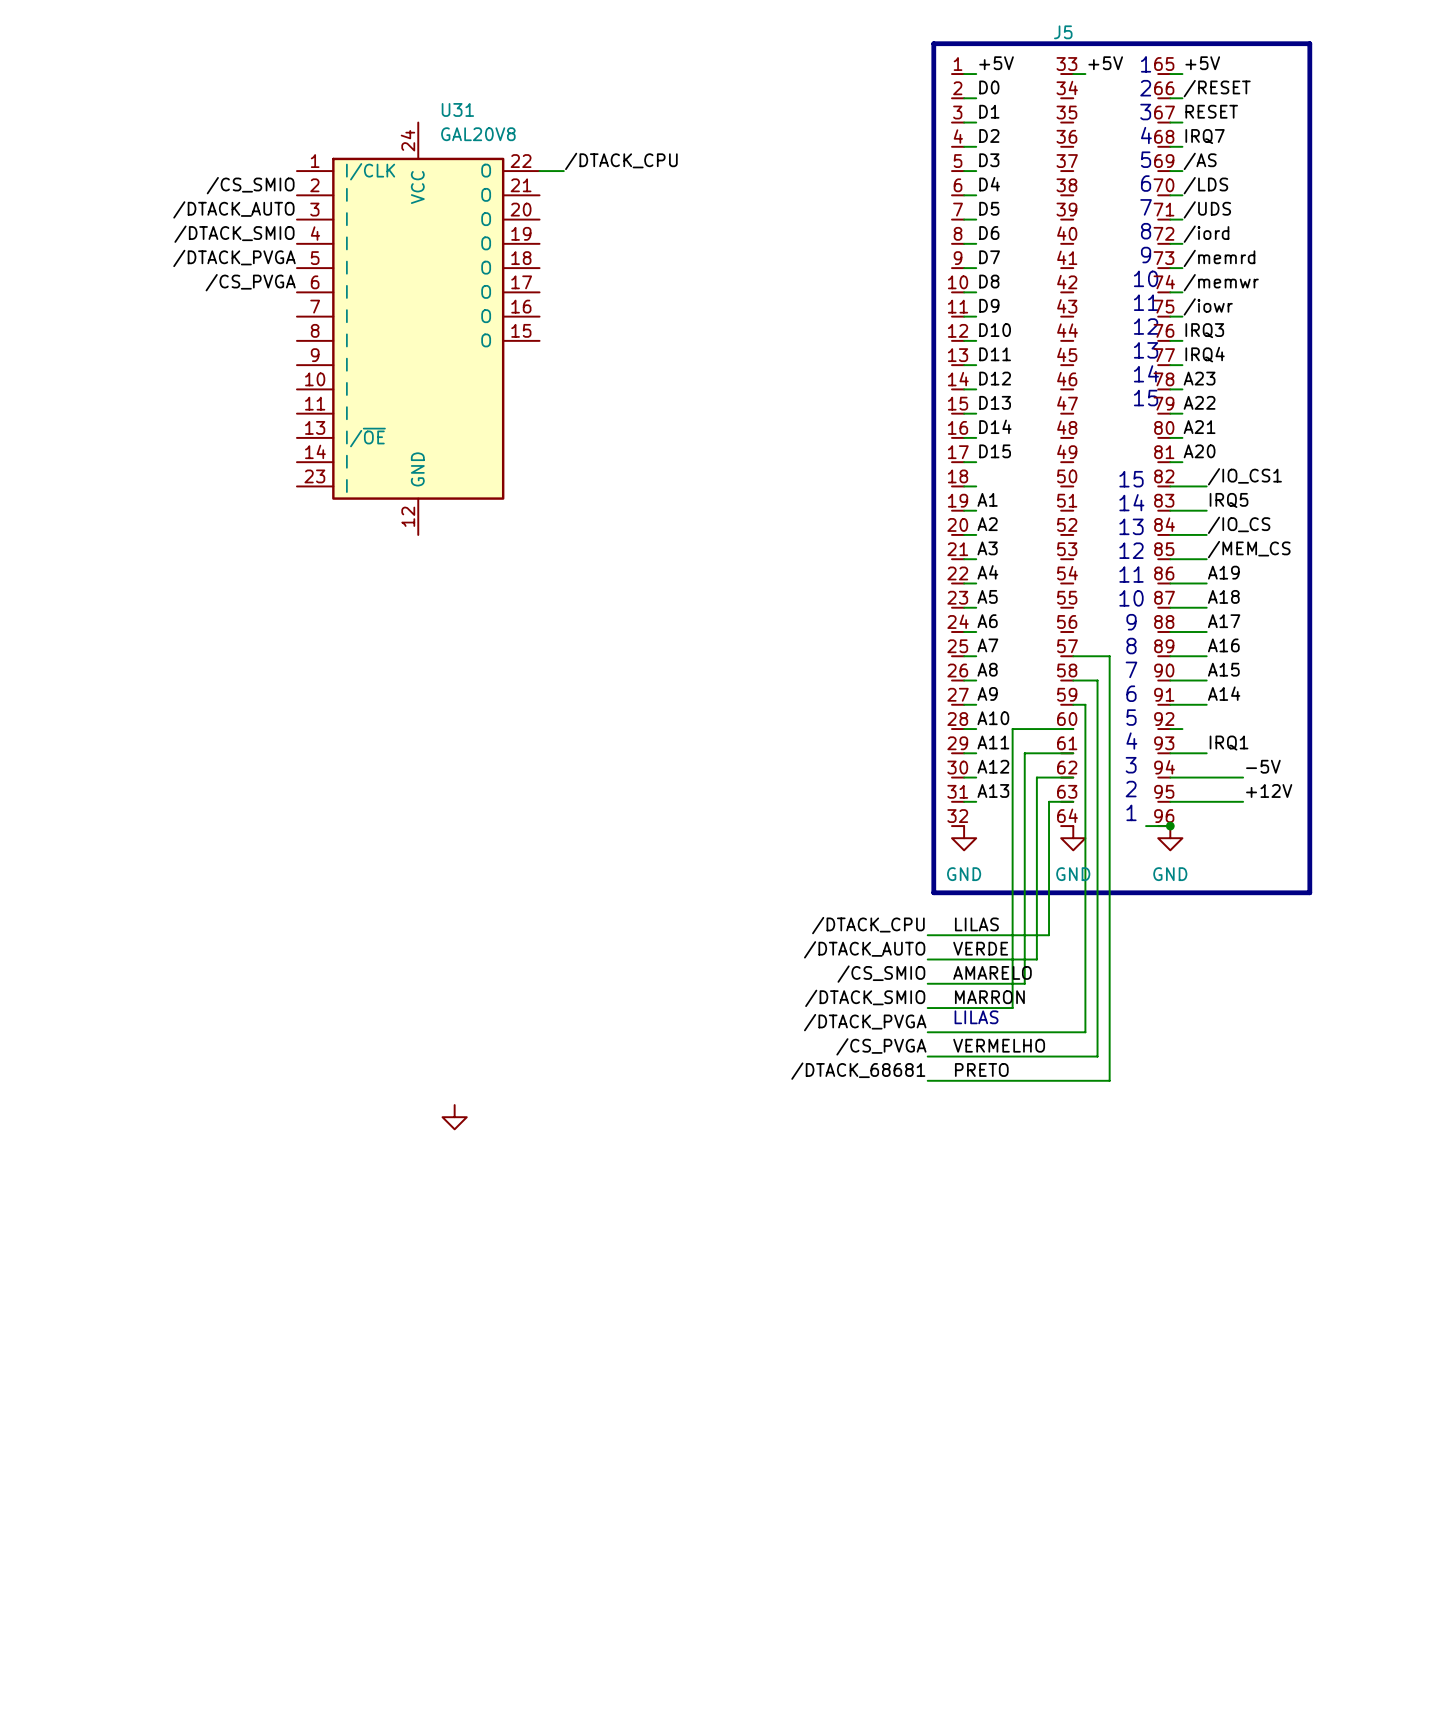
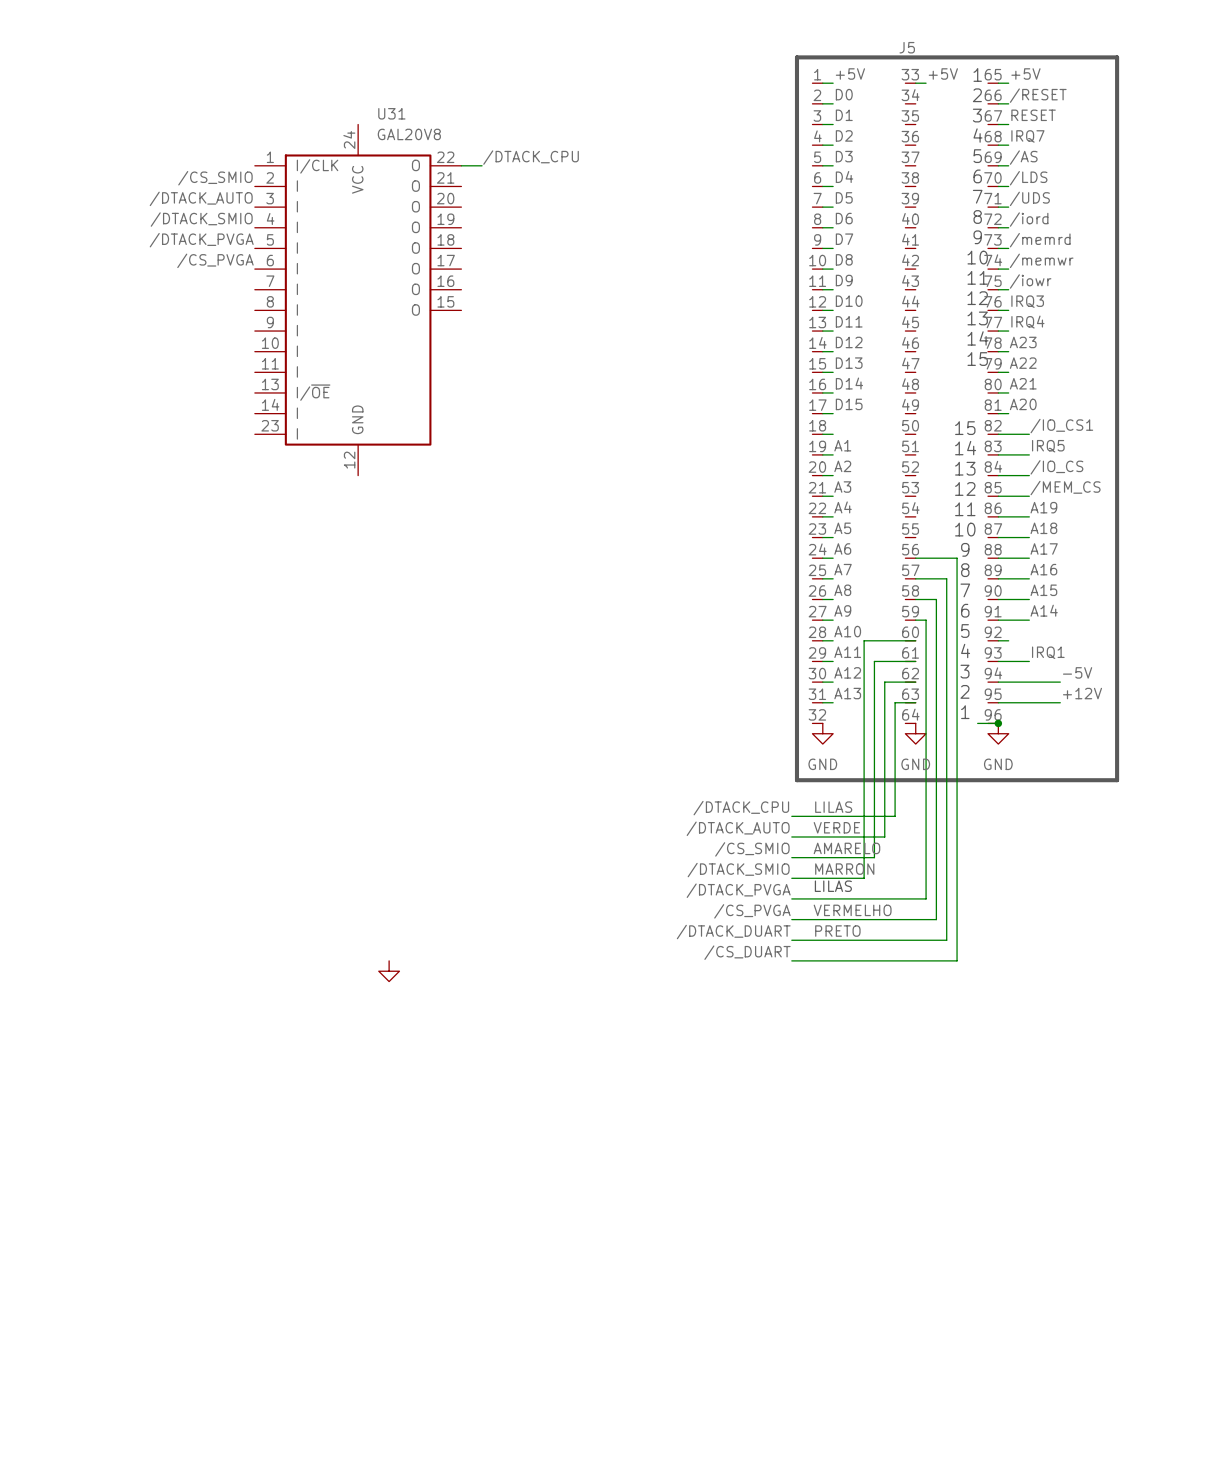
wire: none -> (915, 558) (957, 558) (957, 960) (791, 960)
label: /DTACK_68681 (858, 1071) -> /DTACK_DUART (733, 932)
label: none -> /CS_DUART (747, 952)

